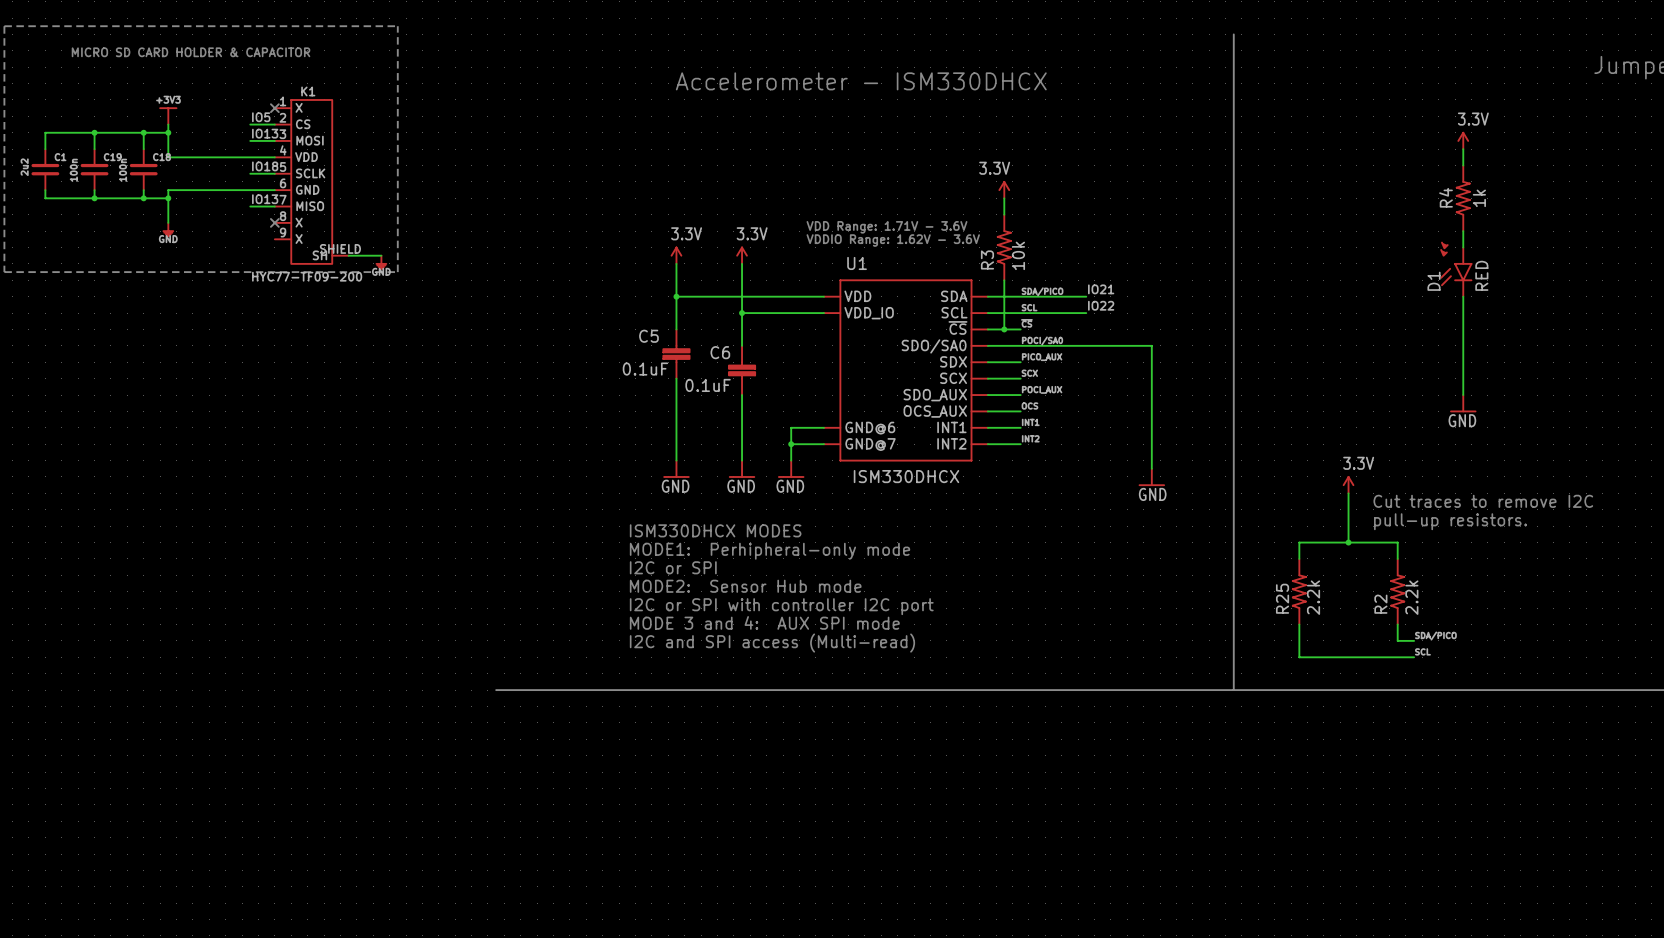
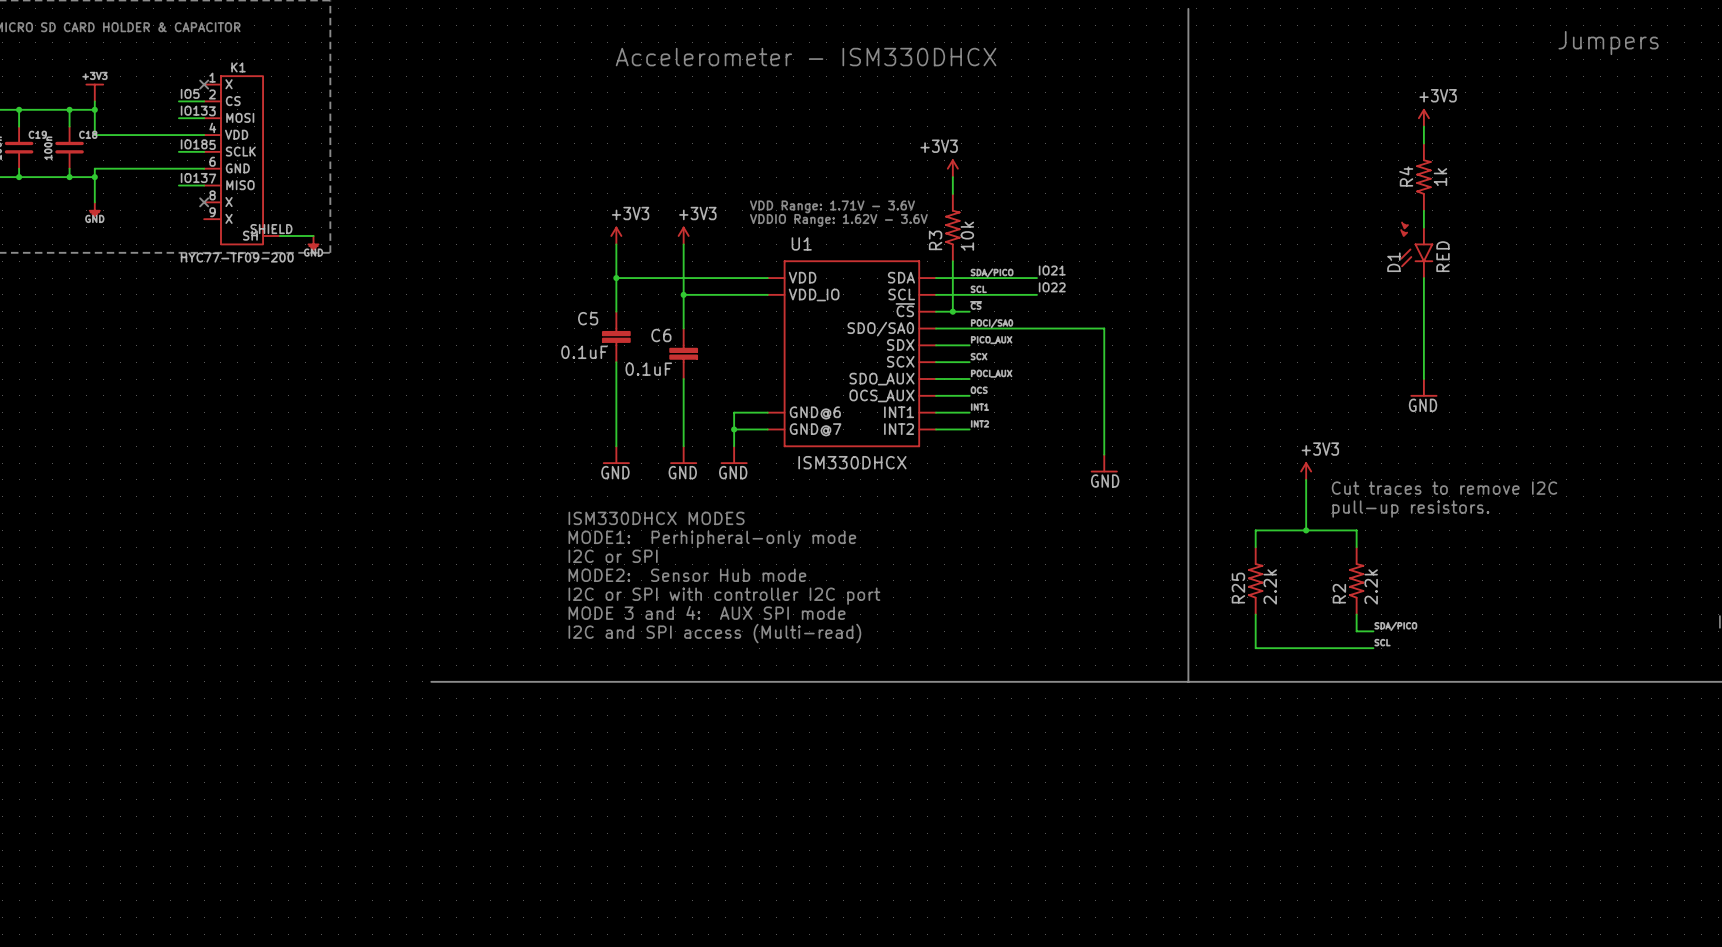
power symbol: 3.3V (1463, 140) -> +3V3 (1423, 117)
power symbol: 3.3V (1004, 189) -> +3V3 (952, 168)
power symbol: 3.3V (676, 255) -> +3V3 (616, 235)
power symbol: 3.3V (742, 255) -> +3V3 (683, 235)
power symbol: 3.3V (1348, 484) -> +3V3 (1306, 471)

